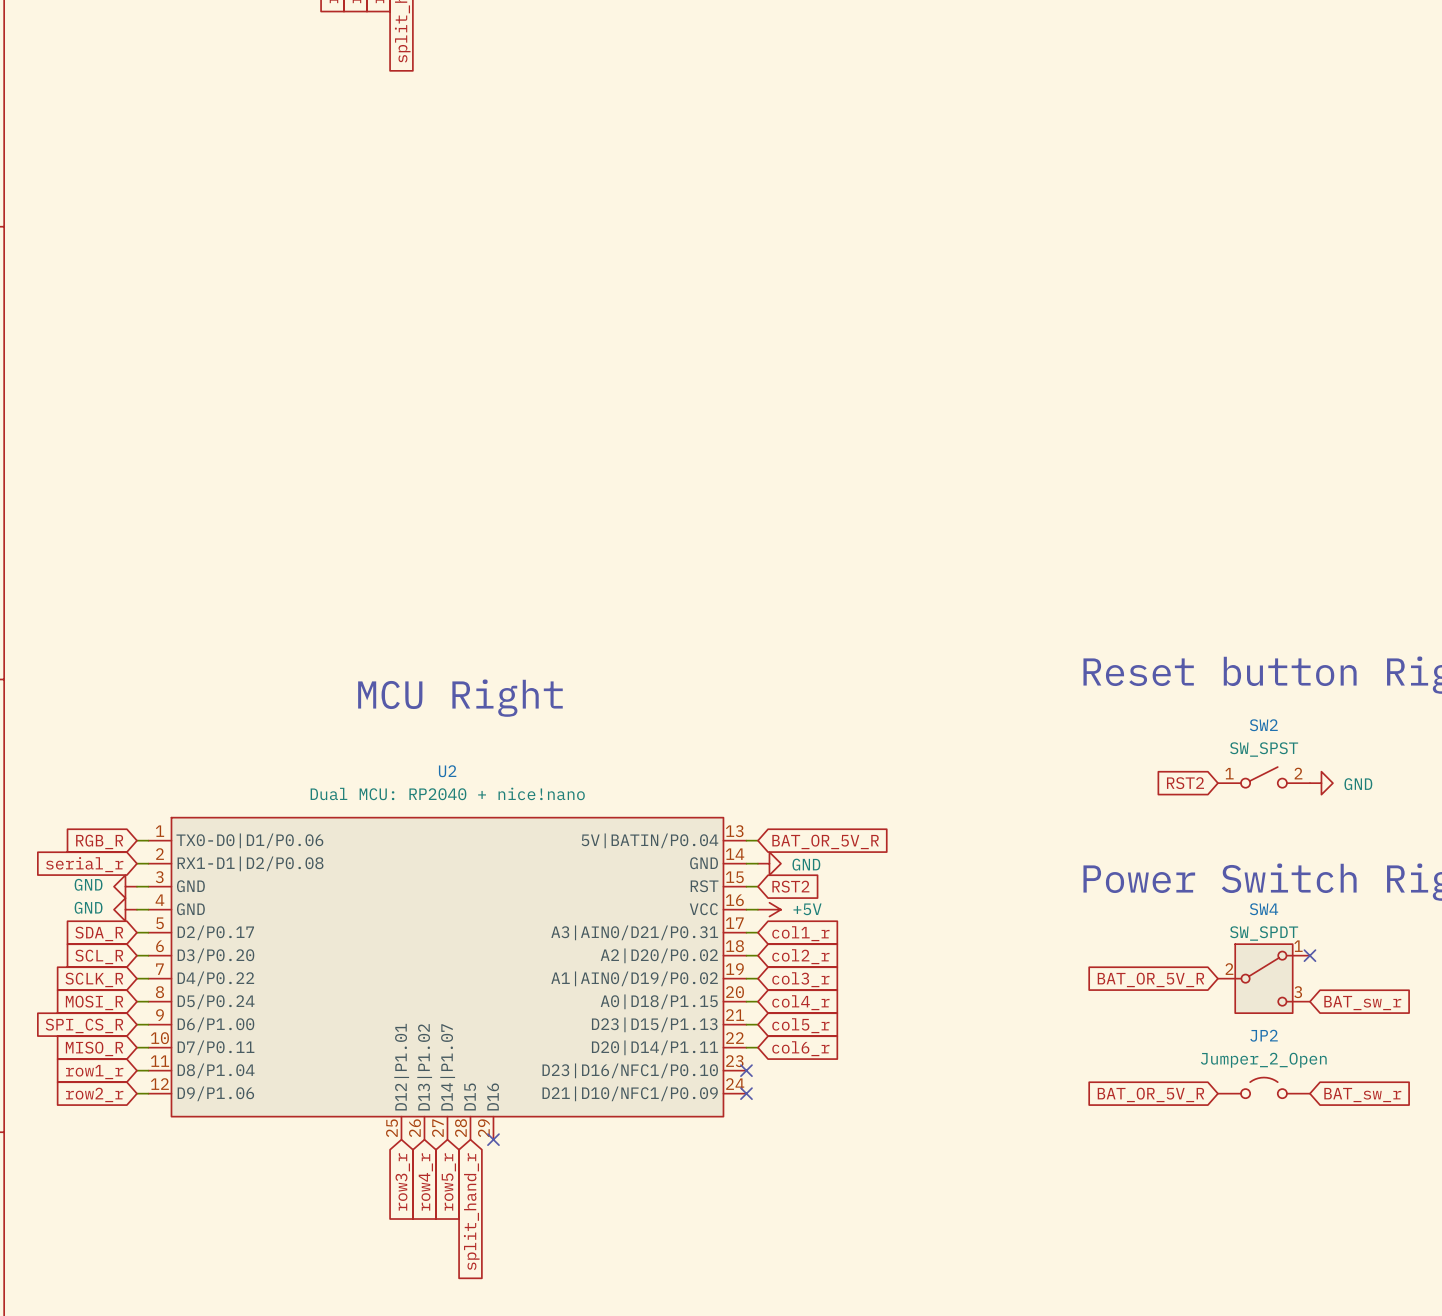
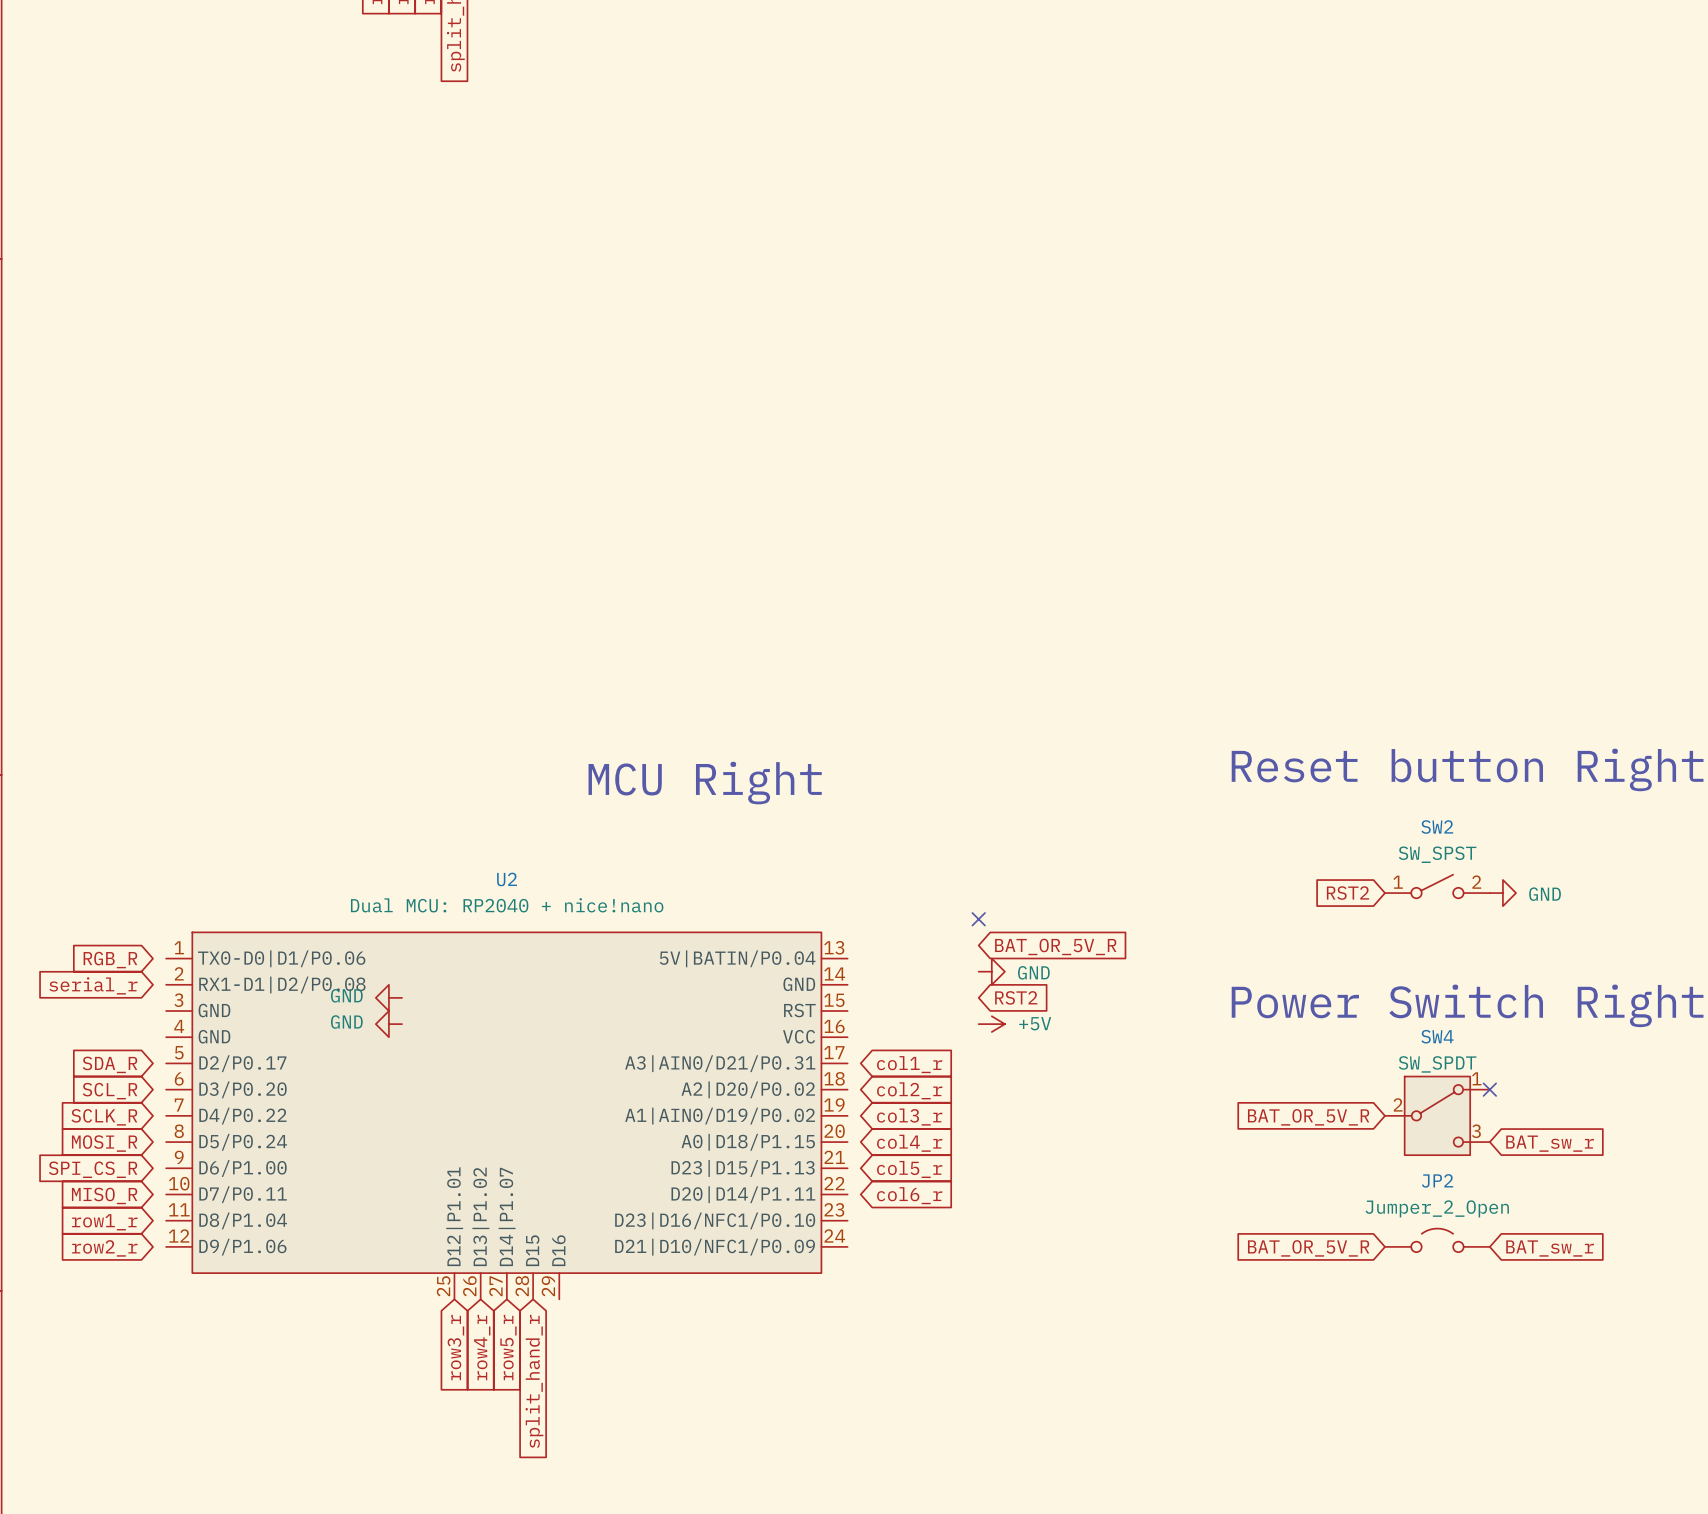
text position: MCU Right (460, 698) -> MCU Right (705, 783)
no-connect mark: none -> (978, 919)
wire: (136, 840) (148, 840) -> none
wire: (746, 840) (757, 840) -> none
global label position: BAT_OR_5V_R (825, 841) -> BAT_OR_5V_R (1055, 946)
wire: (136, 863) (148, 863) -> none
wire: (746, 863) (757, 863) -> none
power symbol position: GND (769, 863) -> GND (991, 971)
power symbol: none -> GND (388, 997)
power symbol: GND (125, 886) -> none
wire: (136, 886) (148, 886) -> none
wire: (746, 886) (757, 886) -> none
global label position: RST2 (790, 886) -> RST2 (1016, 997)
power symbol: none -> GND (388, 1024)
power symbol: GND (125, 909) -> none
wire: (136, 909) (148, 909) -> none
wire: (746, 909) (757, 909) -> none
power symbol position: +5V (769, 909) -> +5V (991, 1024)
wire: (136, 932) (148, 932) -> none
wire: (746, 932) (757, 932) -> none
wire: (136, 955) (148, 955) -> none
wire: (746, 955) (757, 955) -> none
wire: (136, 978) (148, 978) -> none
wire: (746, 978) (757, 978) -> none
wire: (136, 1001) (148, 1001) -> none
wire: (746, 1001) (757, 1001) -> none
wire: (136, 1024) (148, 1024) -> none
wire: (746, 1024) (757, 1024) -> none
wire: (136, 1047) (148, 1047) -> none
wire: (746, 1047) (757, 1047) -> none
wire: (136, 1070) (148, 1070) -> none
no-connect mark: (746, 1070) -> none
wire: (136, 1093) (148, 1093) -> none
no-connect mark: (746, 1093) -> none
no-connect mark: (493, 1139) -> none

